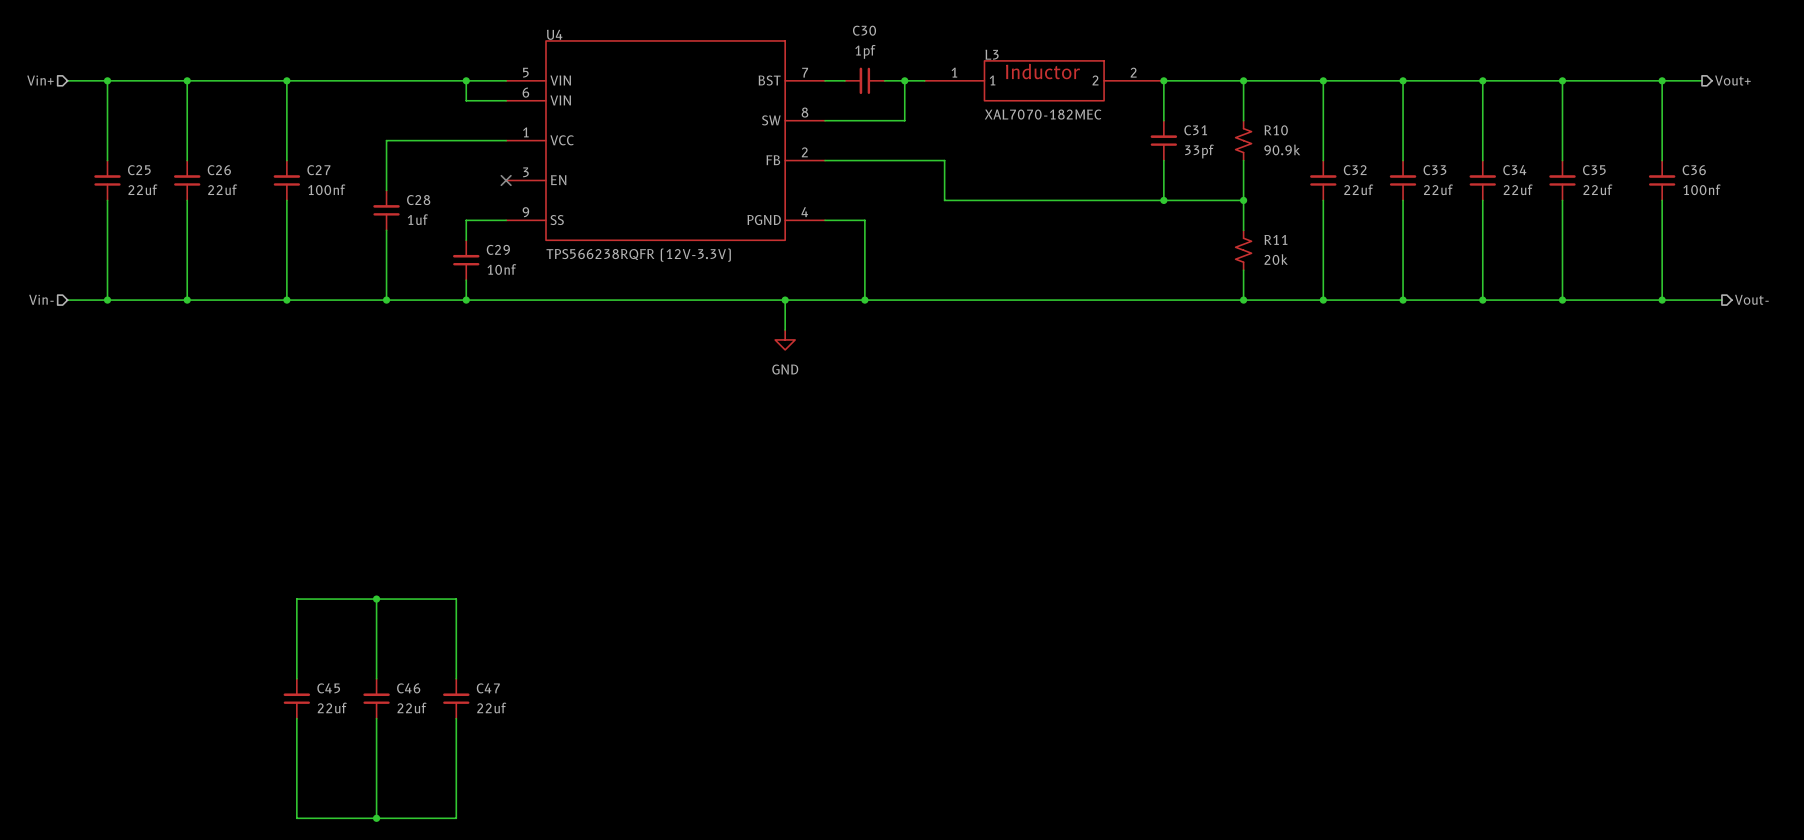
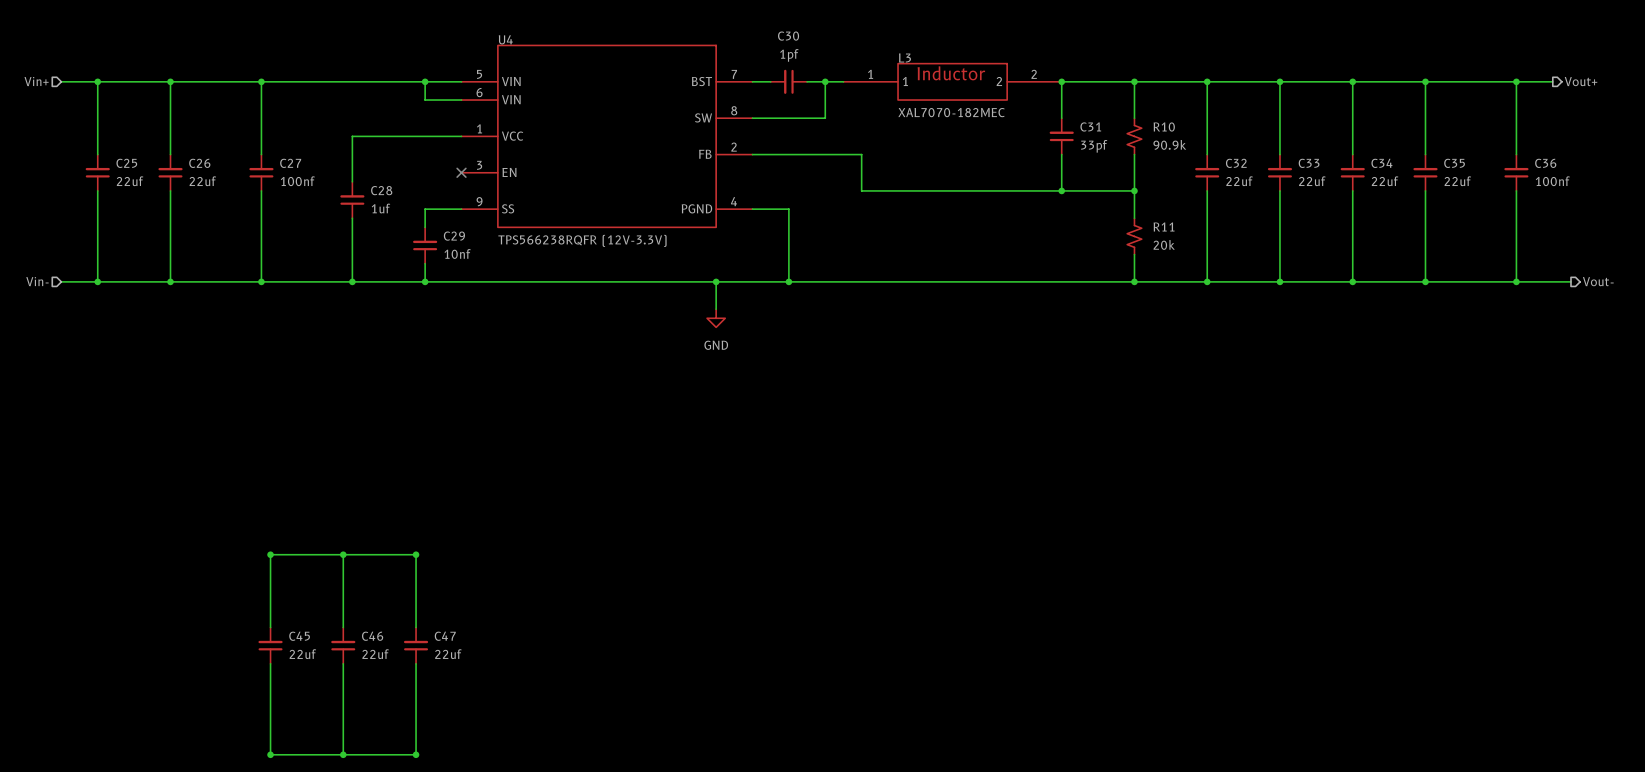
junction: none -> (270, 554)
junction: none -> (416, 554)
junction: none -> (270, 754)
junction: none -> (416, 754)

